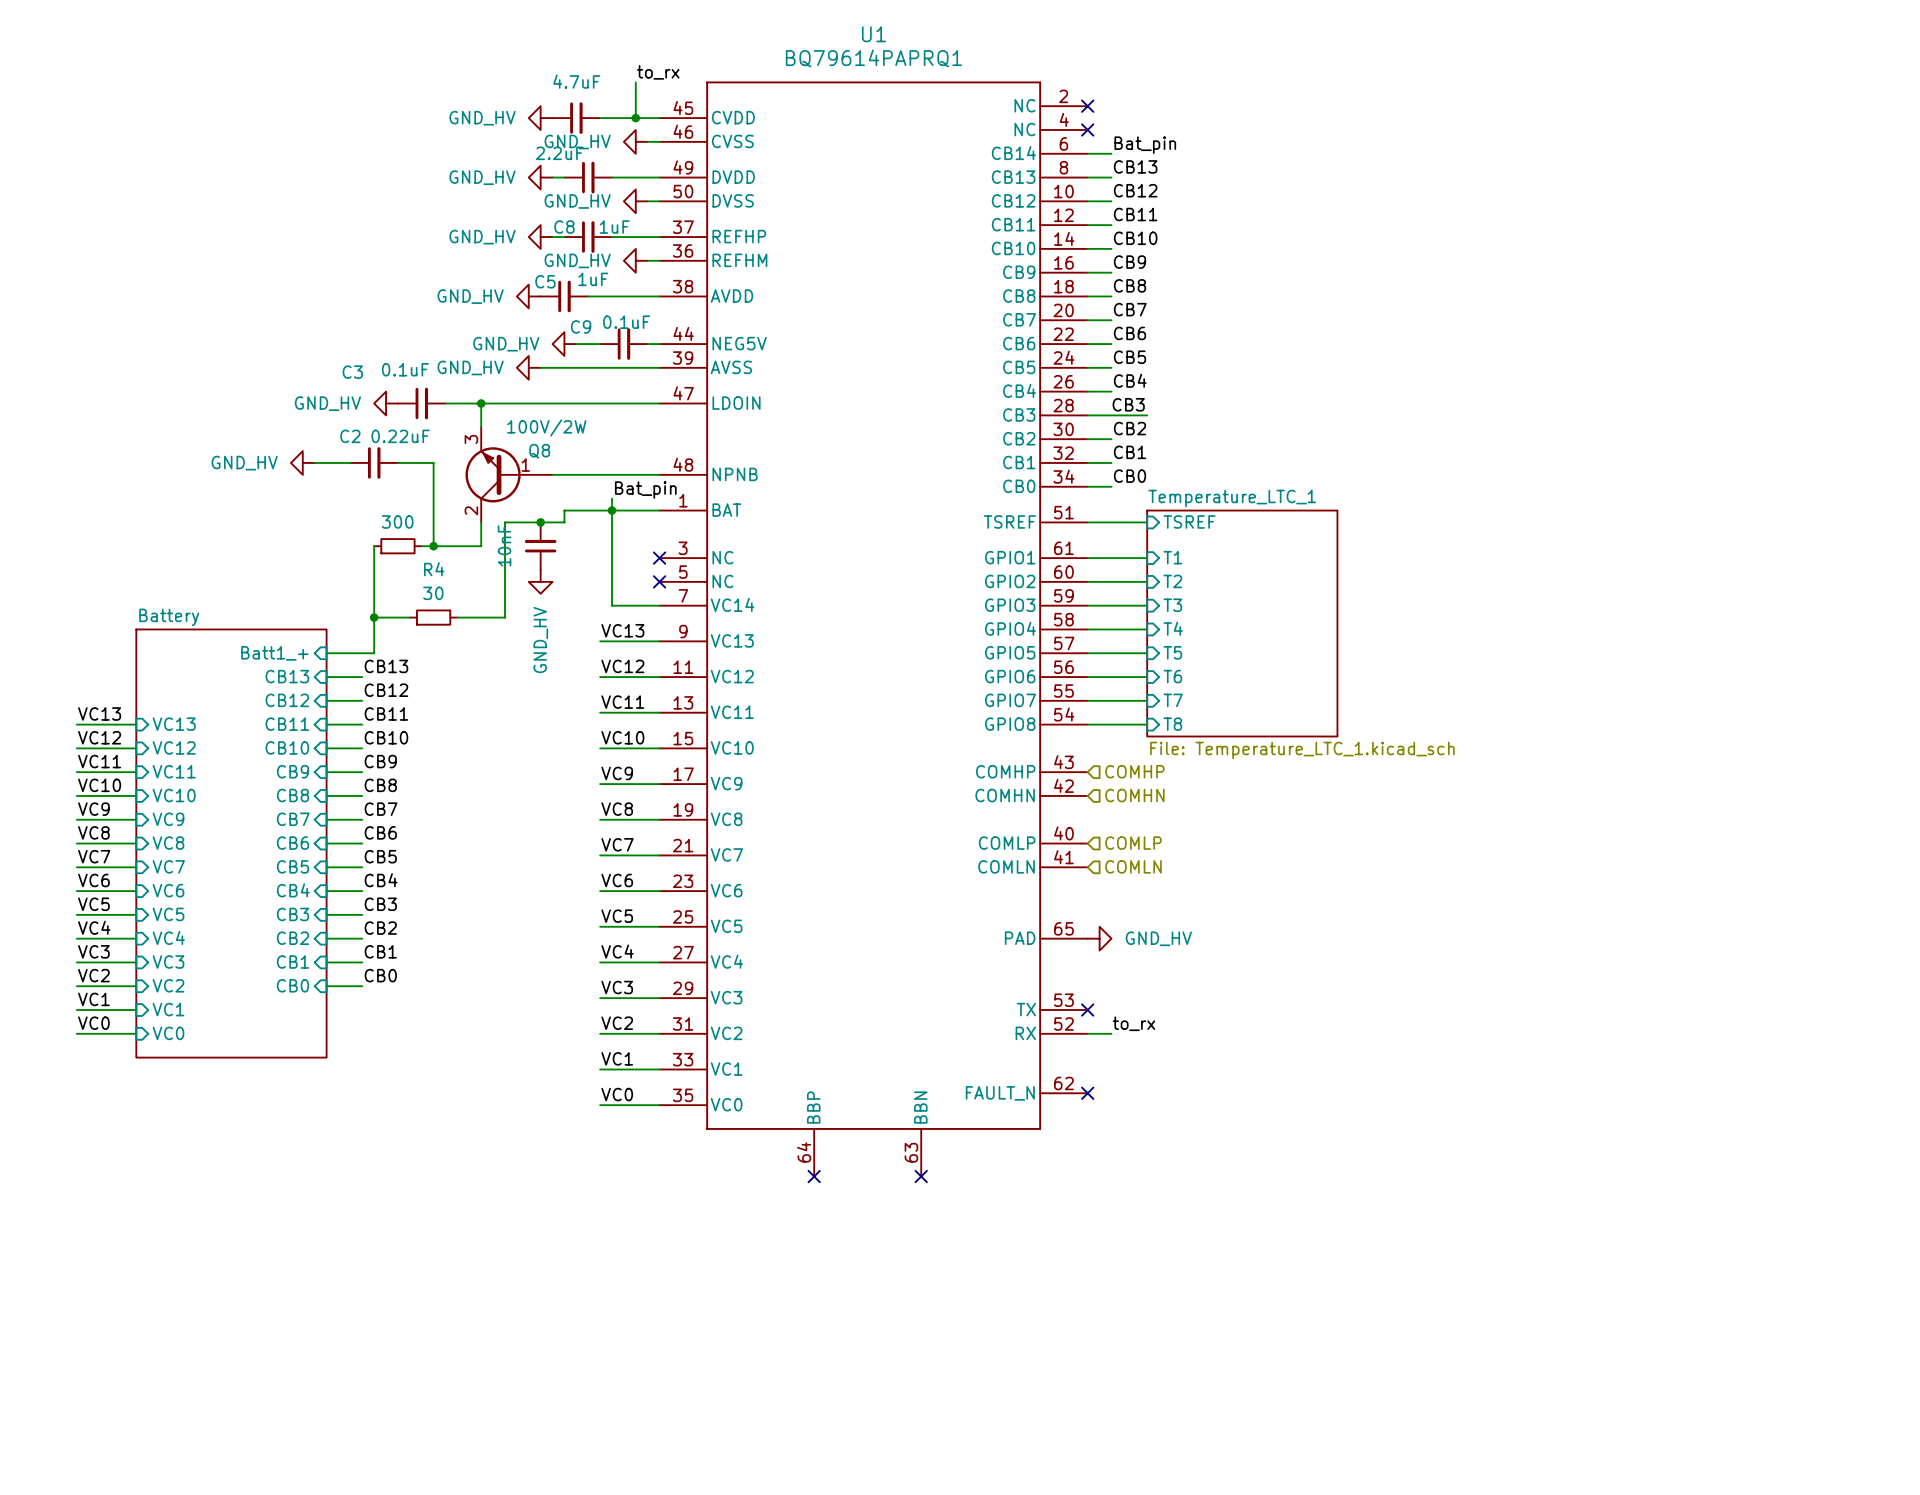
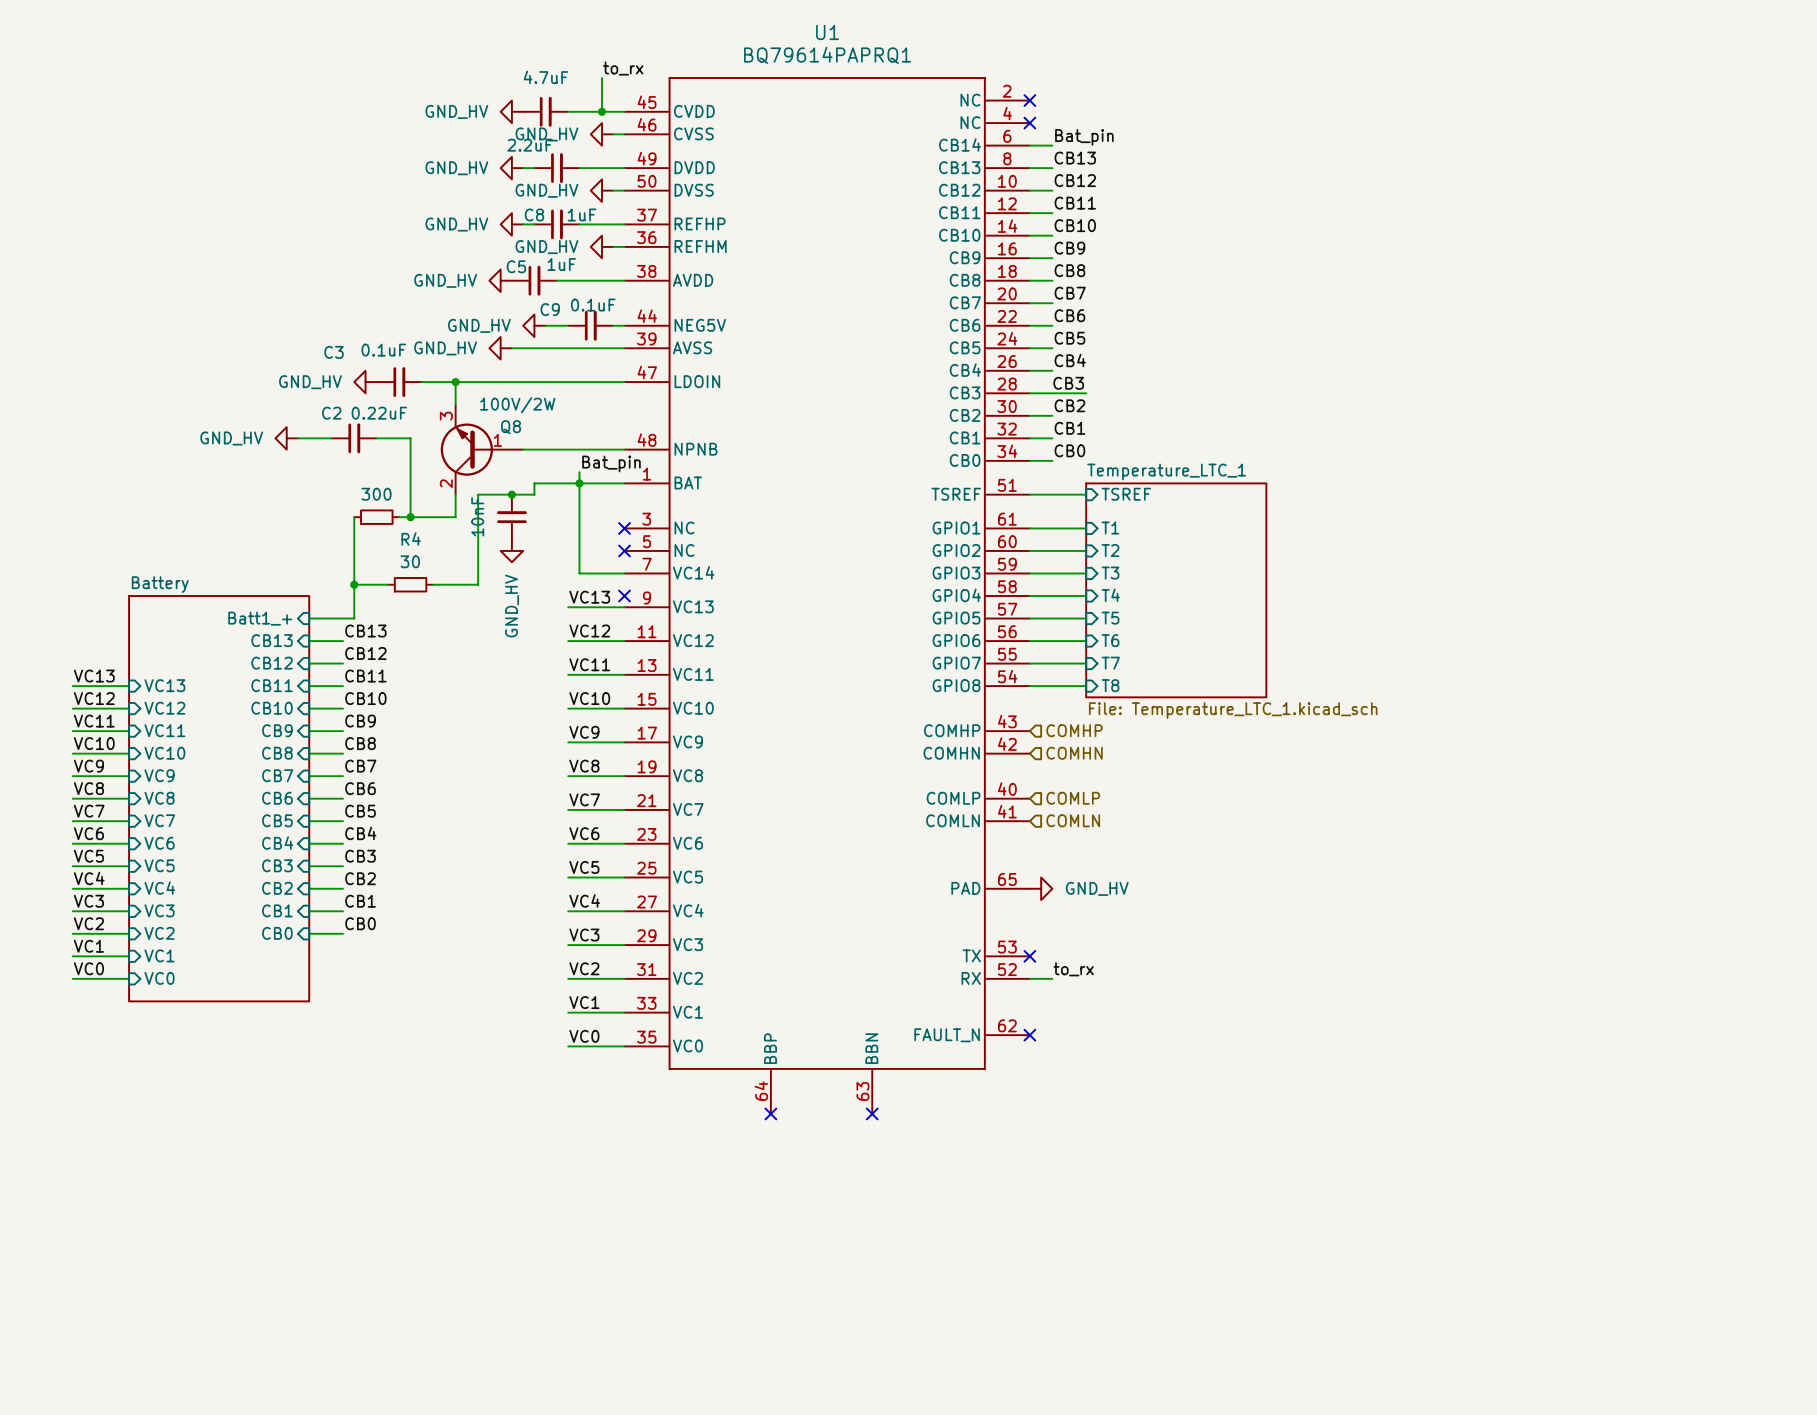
no-connect mark: none -> (624, 596)

